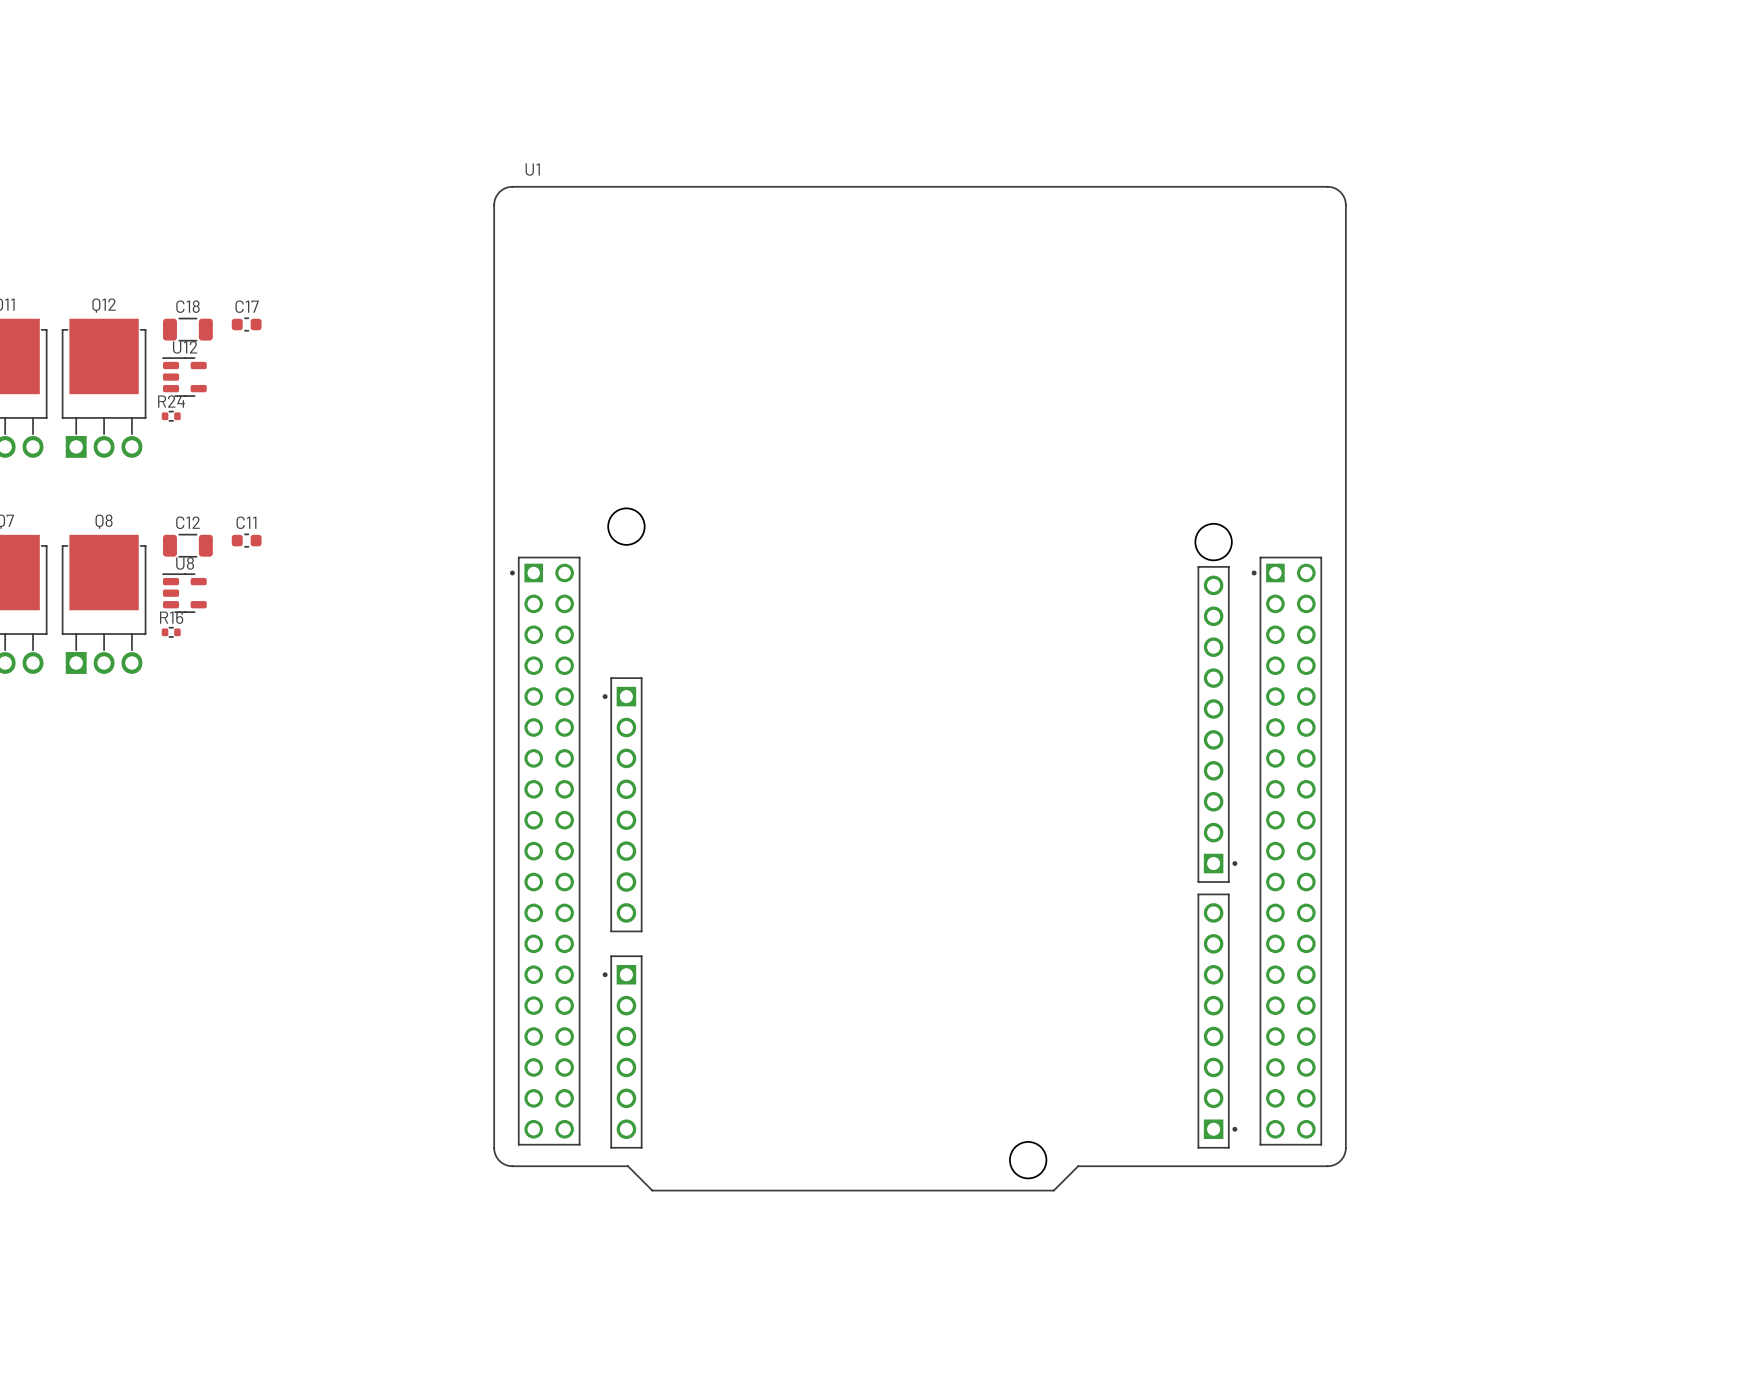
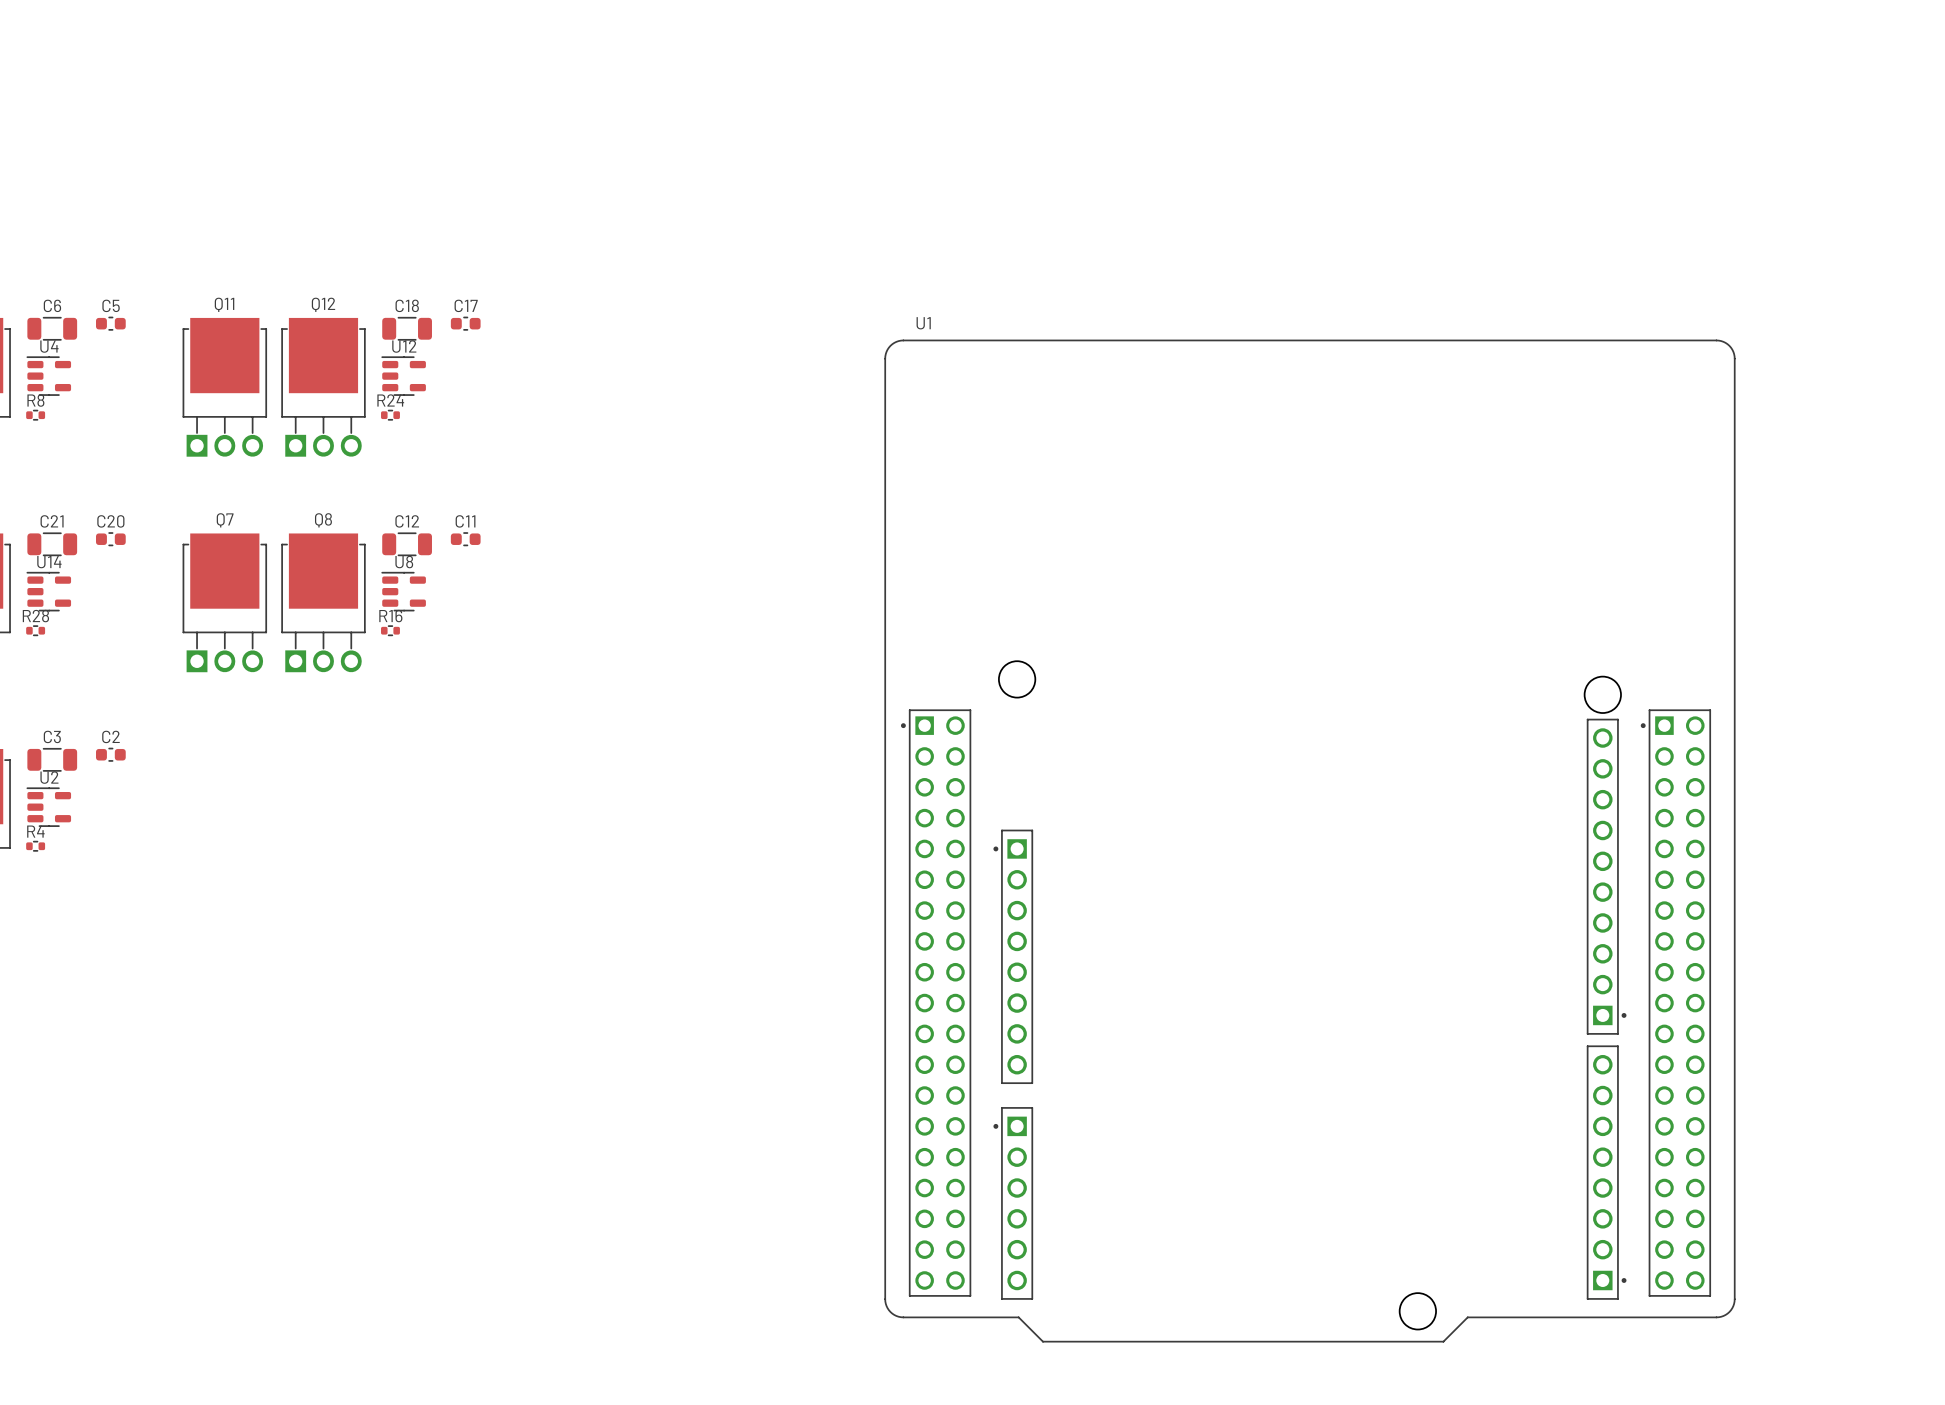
U1 position: (920, 688) -> (1309, 841)

